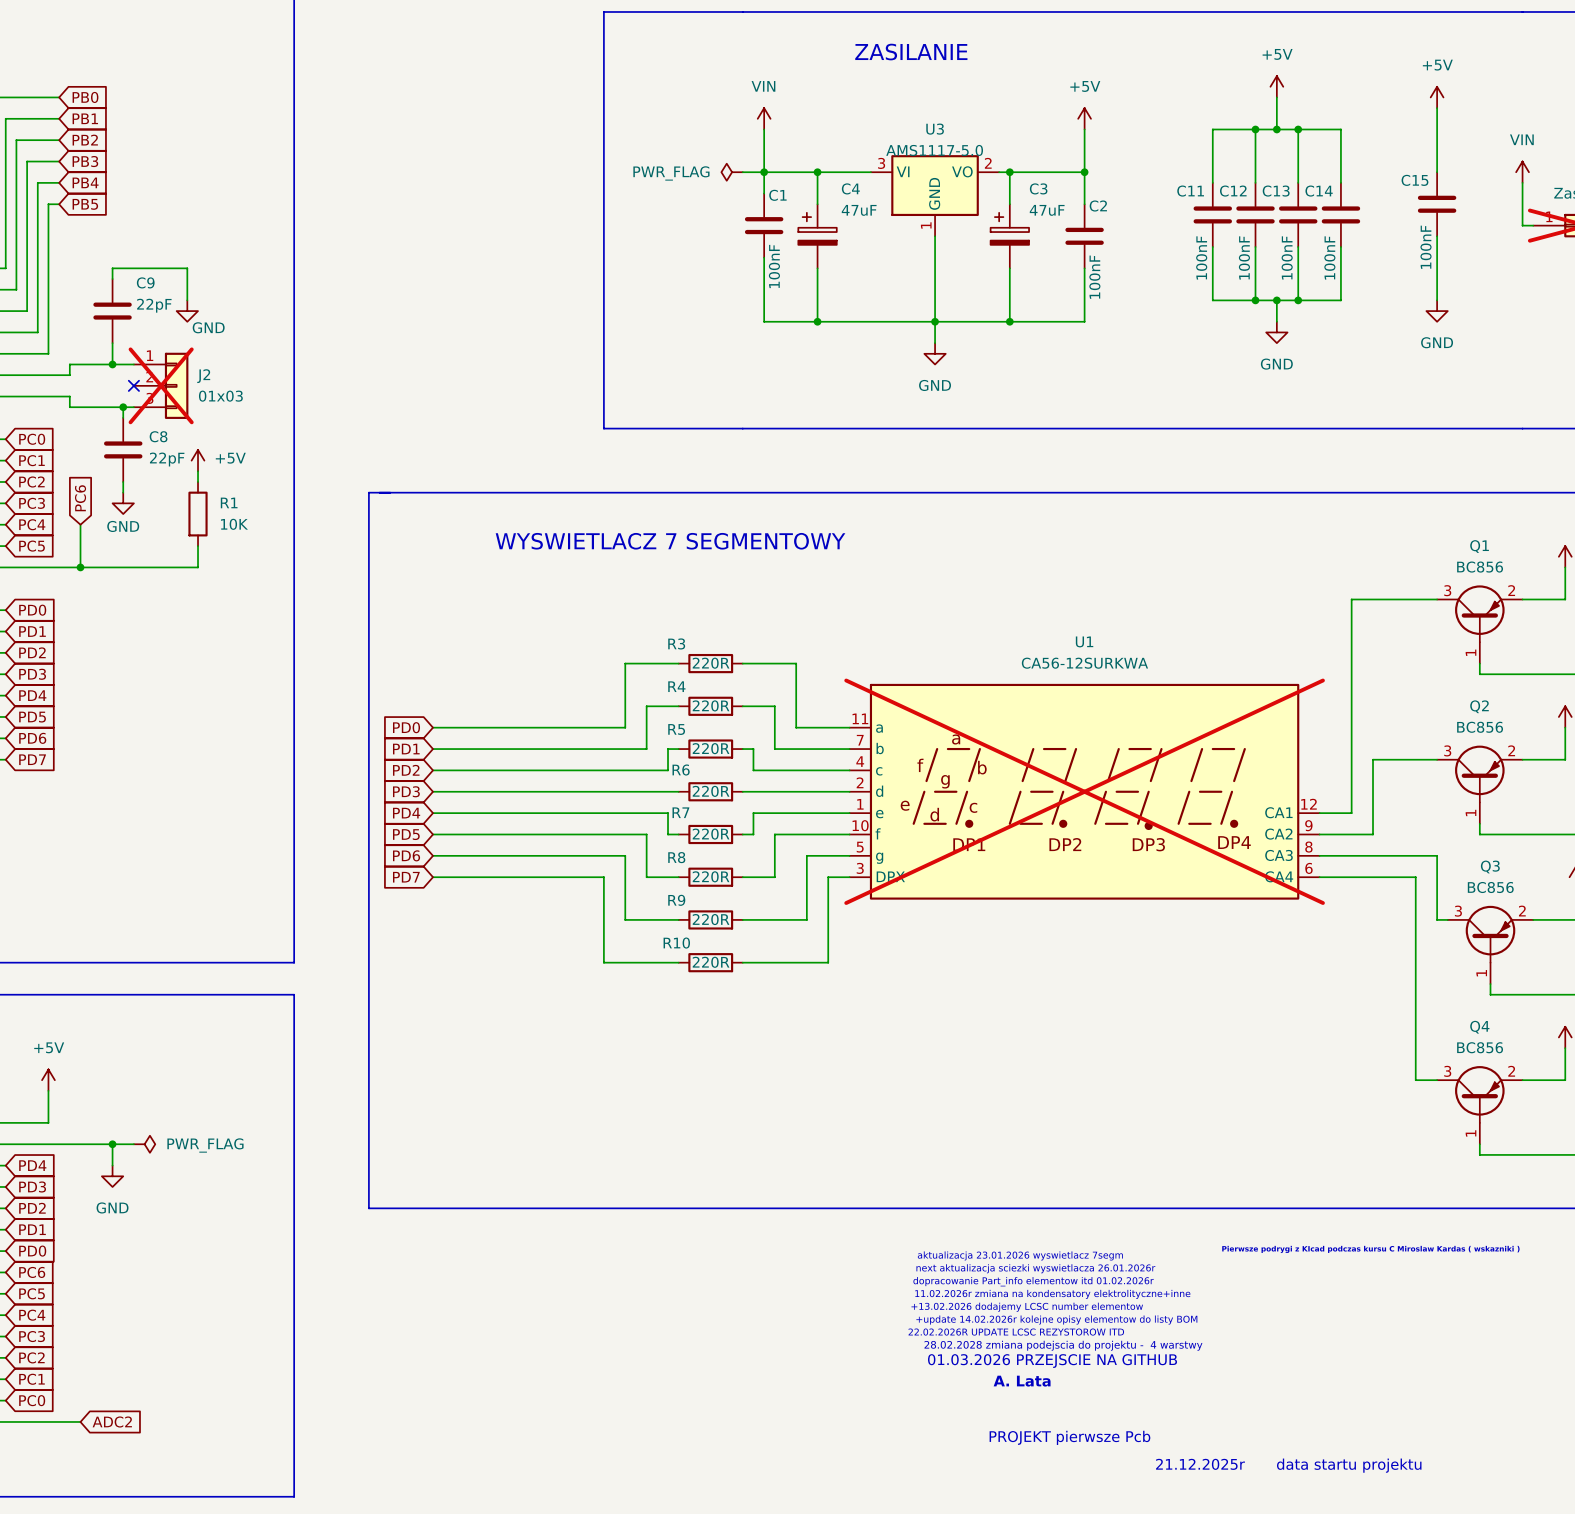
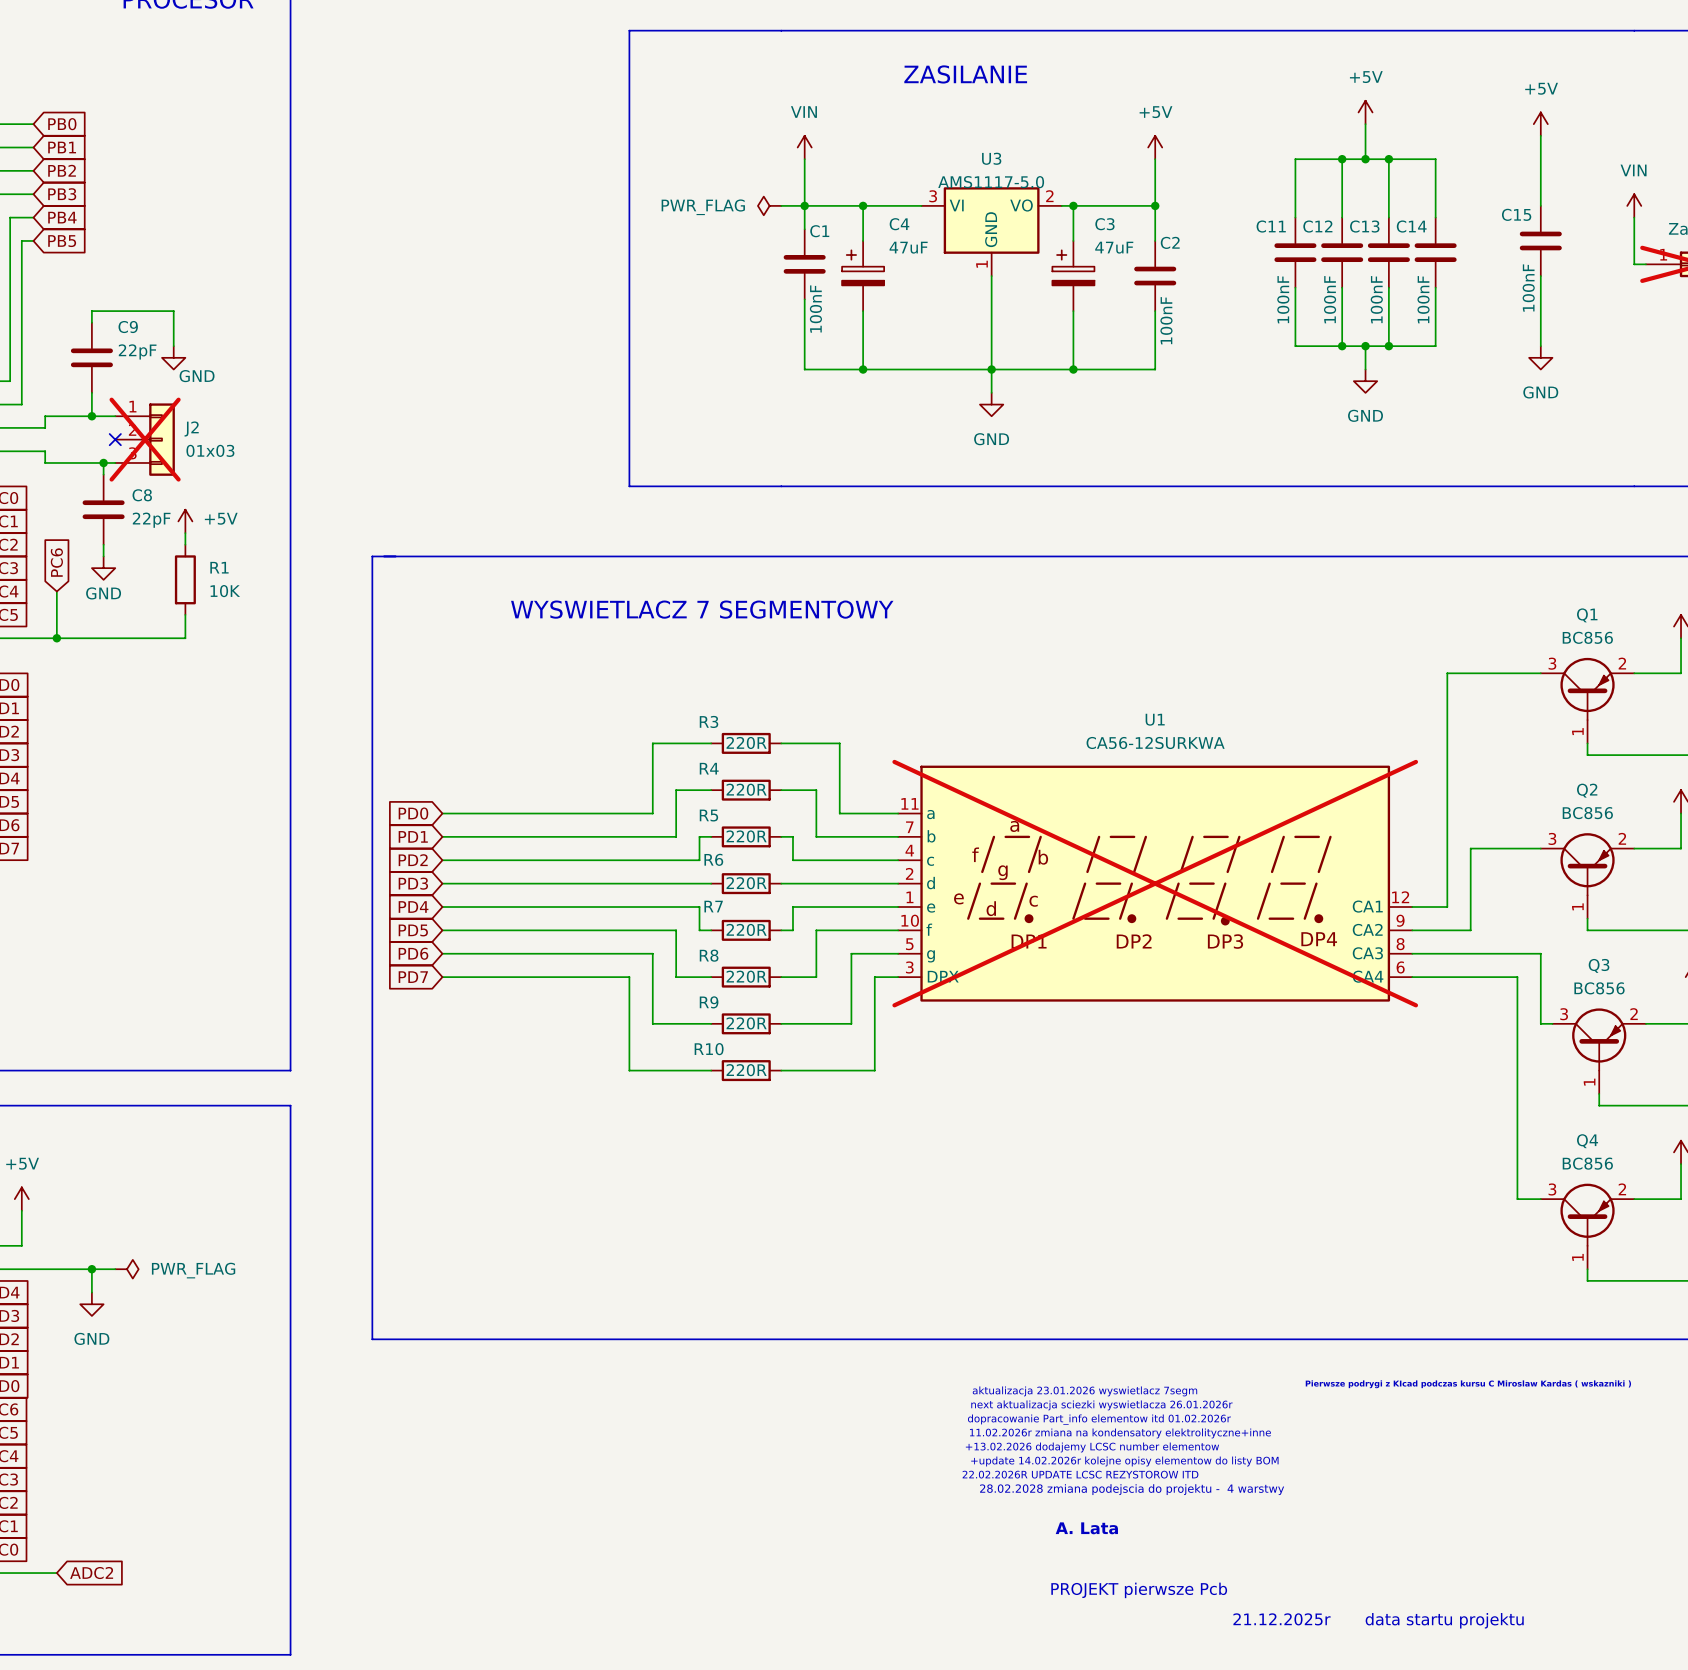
text: 01.03.2026 PRZEJSCIE NA GITHUB (1052, 1361) -> none

